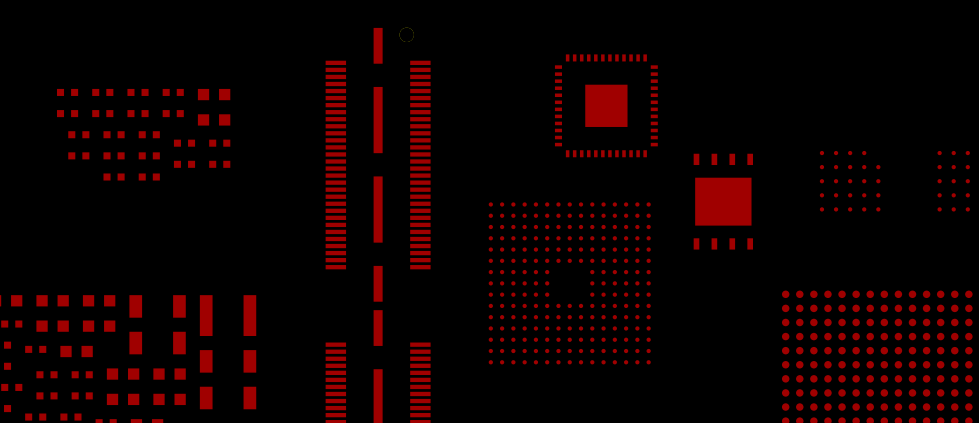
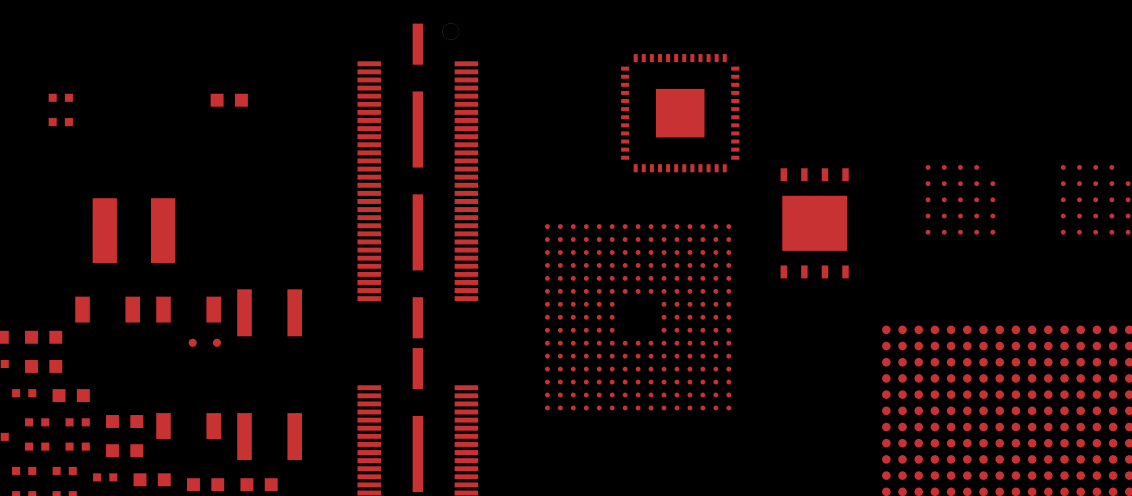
part: (102, 92) -> none
part: (138, 92) -> none
part: (173, 92) -> none
part: (102, 113) -> none
part: (138, 113) -> none
part: (173, 113) -> none
part: (214, 119) -> none
part: (78, 134) -> none
part: (114, 134) -> none
part: (149, 134) -> none
part: (184, 143) -> none
part: (219, 143) -> none
part: (78, 155) -> none
part: (114, 155) -> none
part: (149, 155) -> none
part: (184, 164) -> none
part: (219, 164) -> none
part: (114, 176) -> none
part: (149, 176) -> none
part: none -> (133, 230)
part: none -> (107, 309)
part: none -> (188, 309)
part: none -> (269, 312)
part: (99, 300) -> none
part: none -> (192, 342)
part: none -> (216, 342)
part: (157, 306) -> none
part: (228, 315) -> none
part: (99, 326) -> none
part: (157, 343) -> none
part: (228, 361) -> none
part footprint: [153, 368, 186, 380] -> [156, 413, 222, 440]
part: none -> (269, 436)
part: (228, 398) -> none
part: (169, 399) -> none

